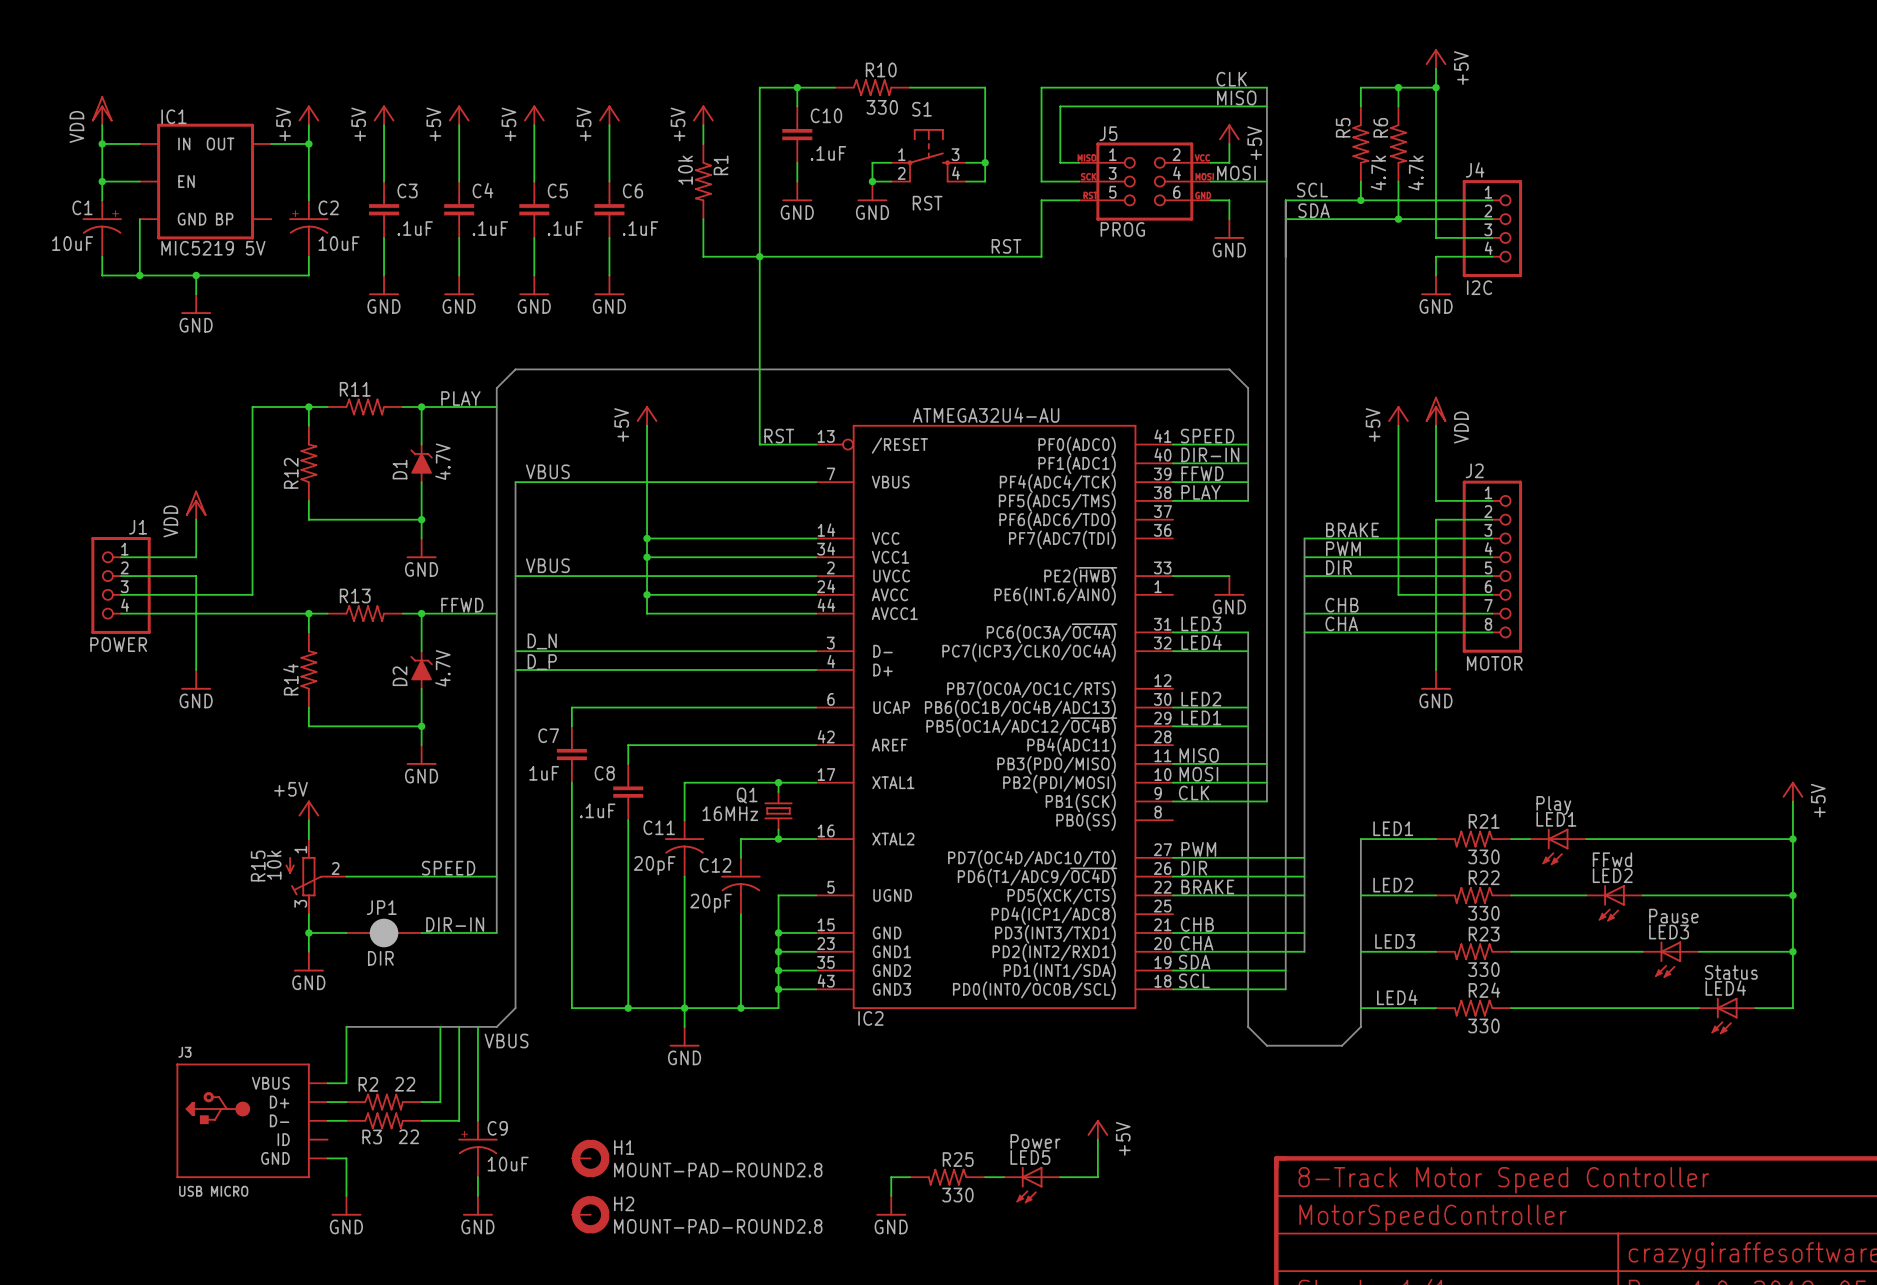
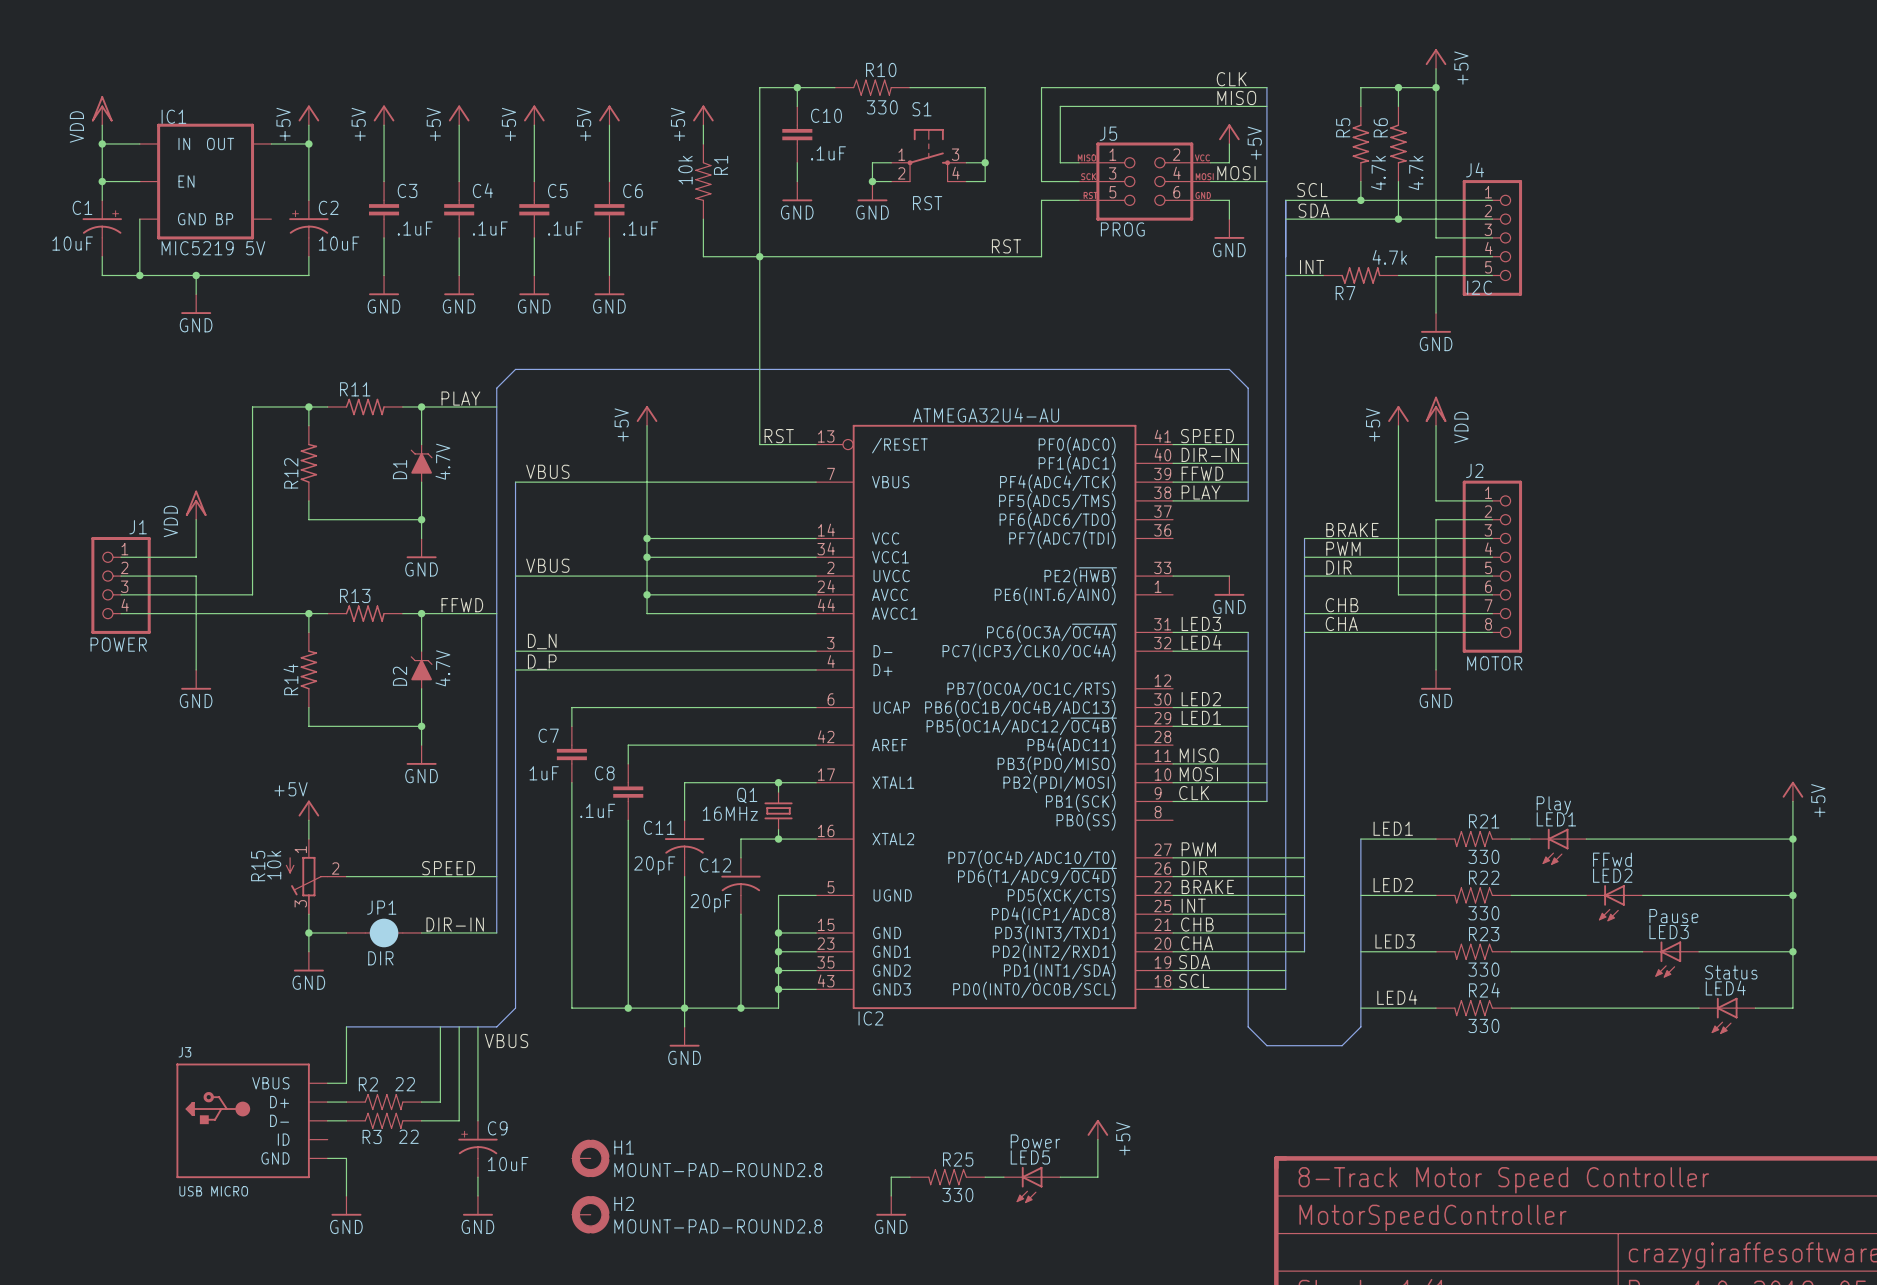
J4 symbol: [1462, 180, 1523, 277] -> [1462, 180, 1523, 296]
label: none -> INT (1312, 267)
wire: none -> (1285, 275) (1323, 275)
R7: none -> 4.7k (1360, 275)
wire: none -> (1398, 275) (1492, 275)
power symbol position: GND (1436, 285) -> GND (1436, 322)
label: none -> INT (1193, 905)
wire: none -> (1173, 914) (1285, 914)

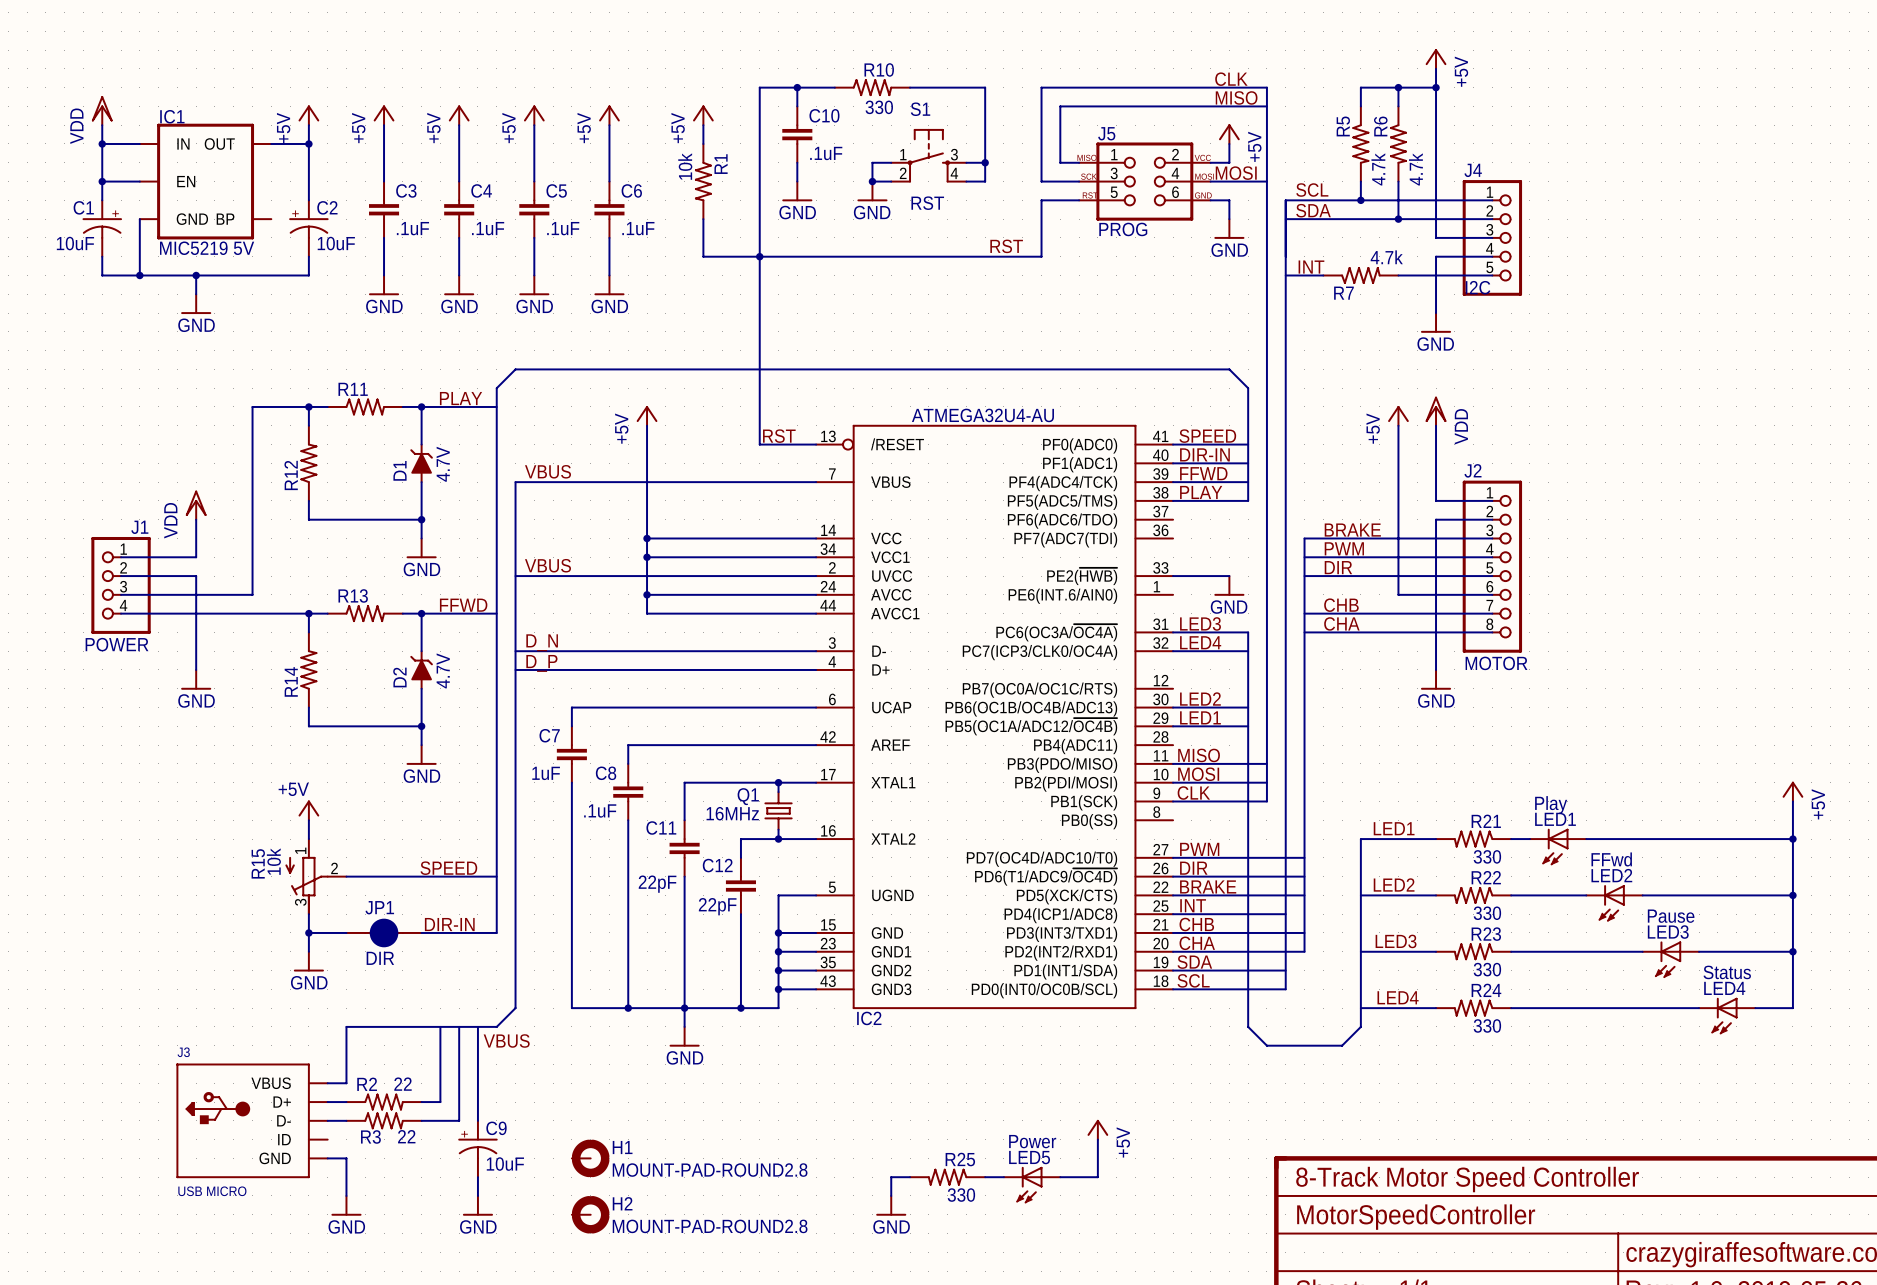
C11 symbol: [664, 820, 705, 877] -> [669, 820, 700, 877]
C12 symbol: [721, 857, 761, 915] -> [725, 857, 756, 915]
C11 value: 20pF (654, 865) -> 22pF (657, 884)
C12 value: 20pF (711, 903) -> 22pF (717, 906)

